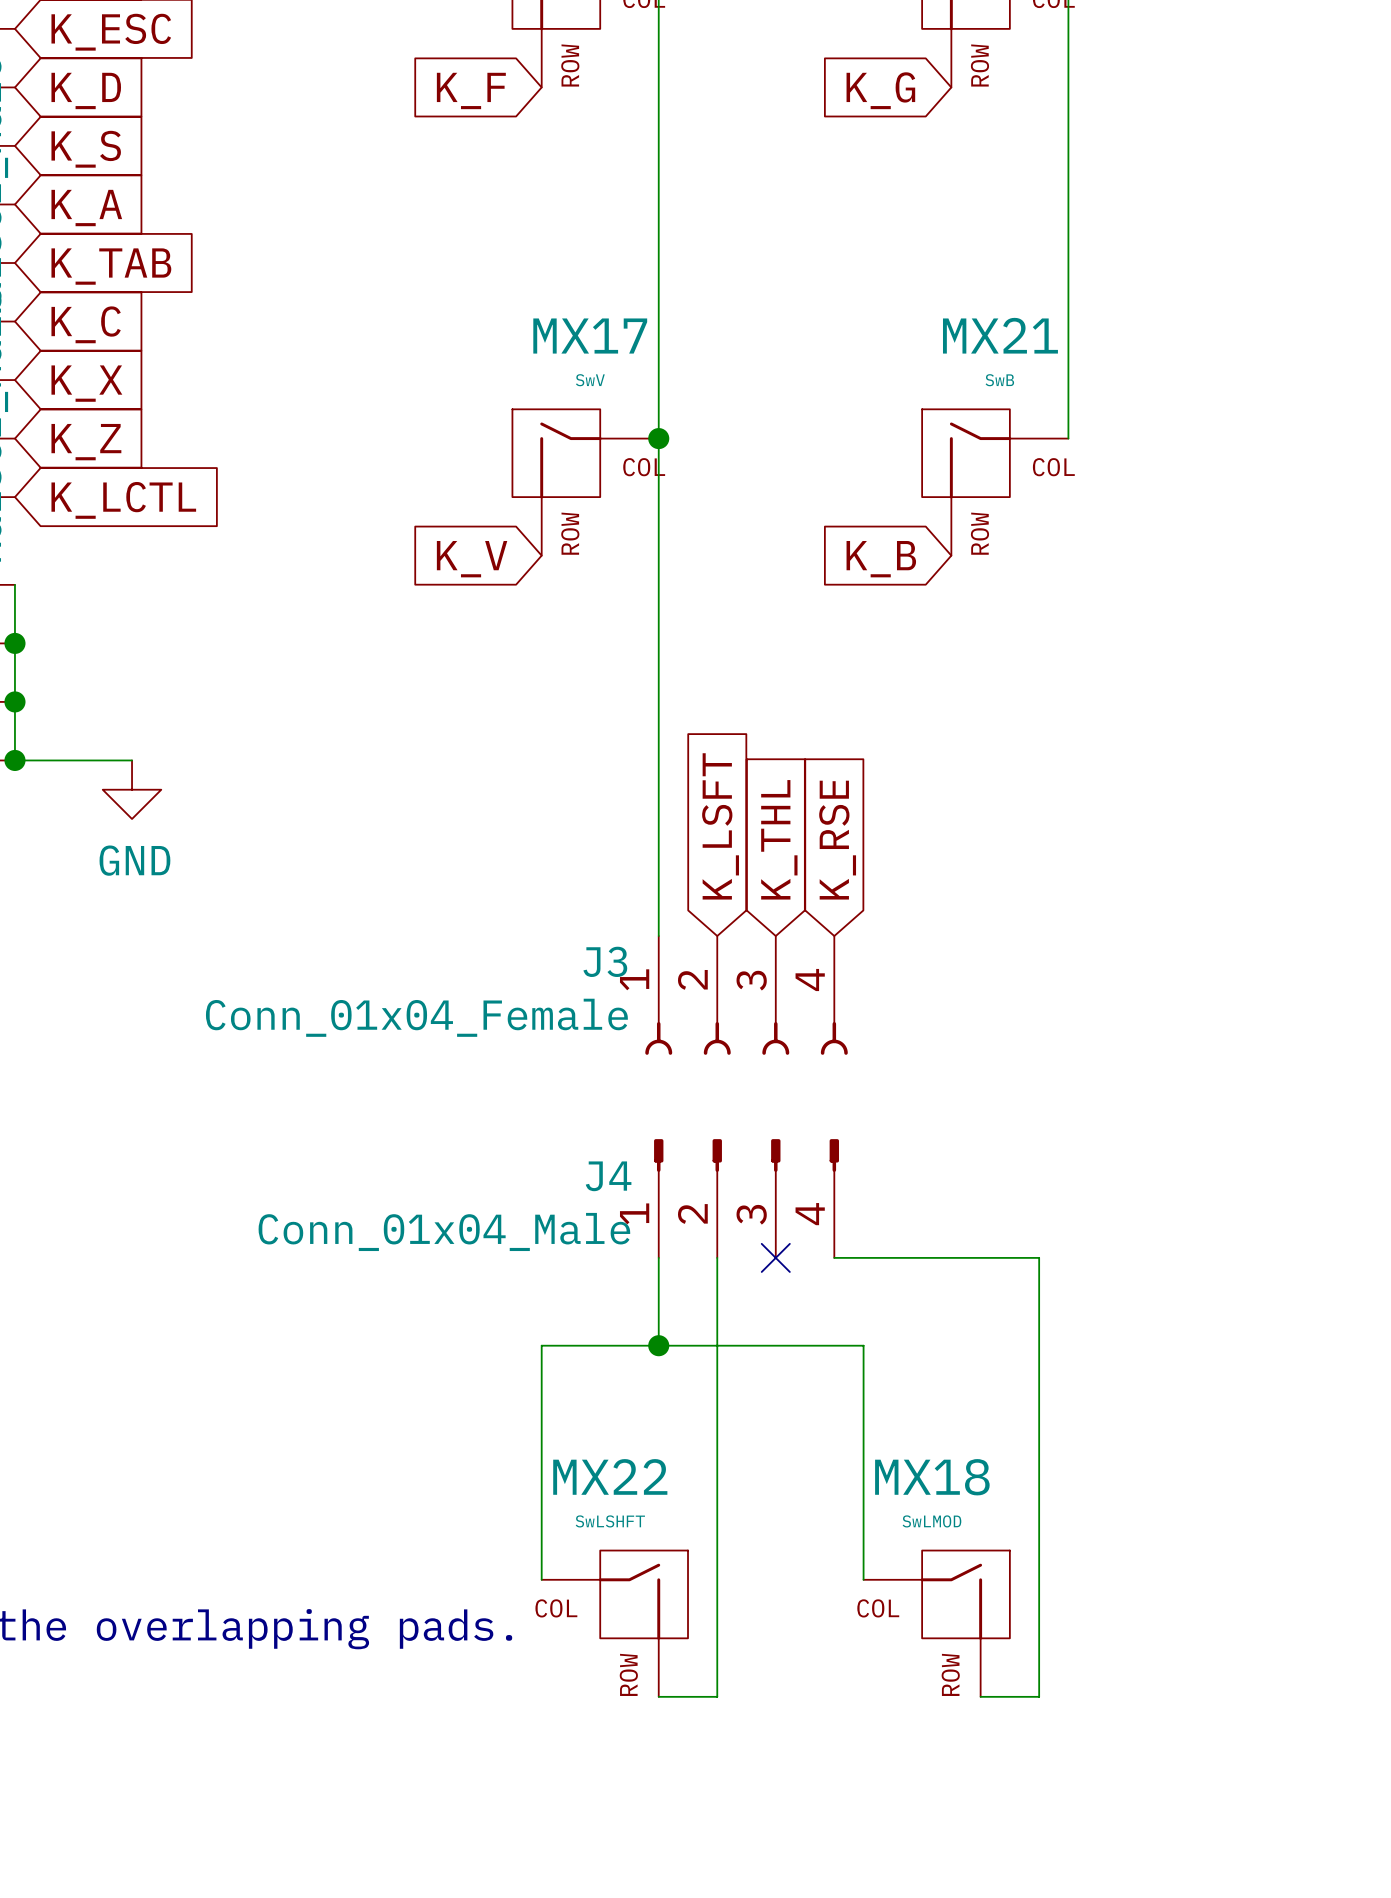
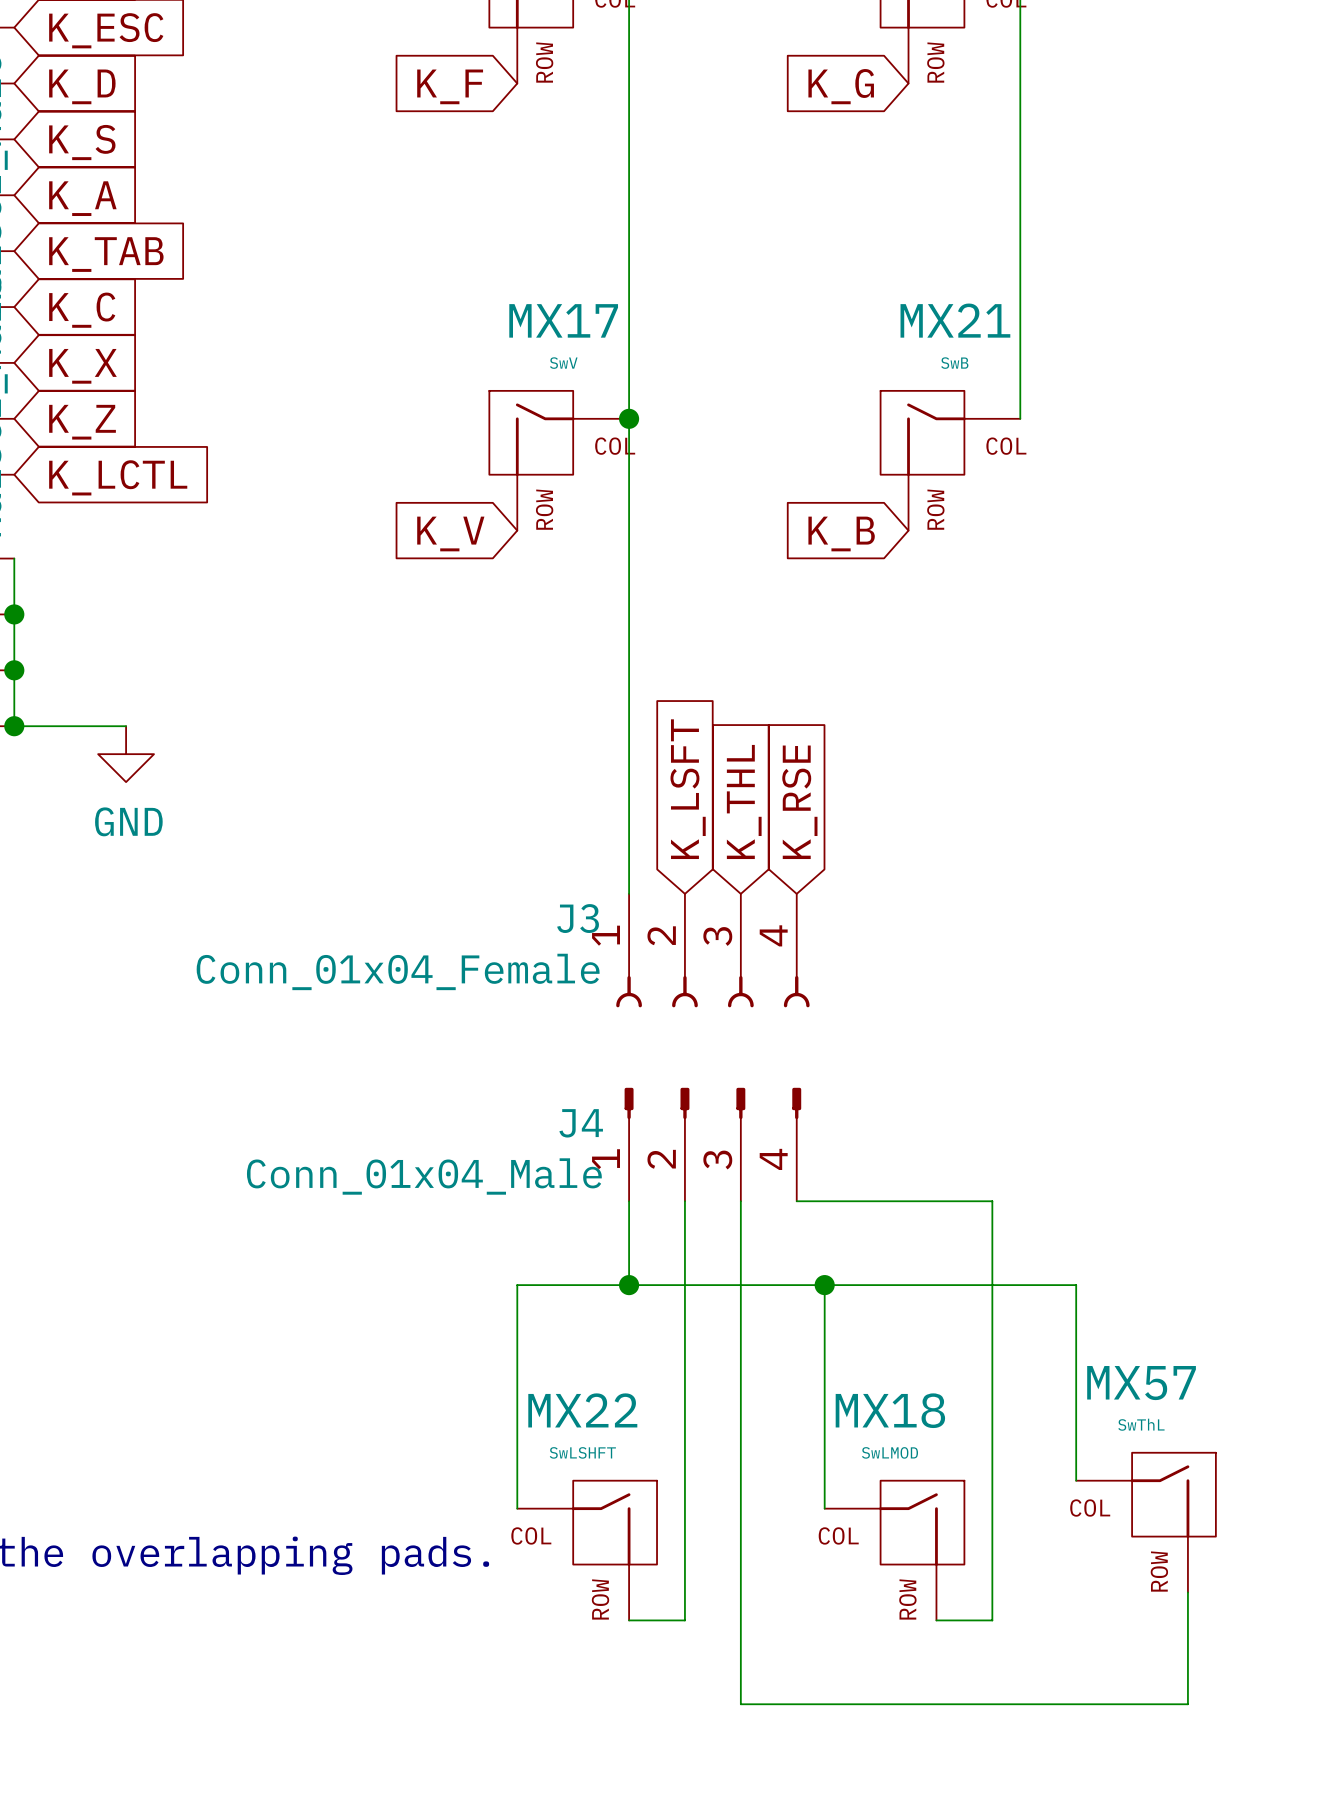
wire: none -> (740, 1201) (740, 1704) (1187, 1704) (1187, 1592)
no-connect mark: (775, 1257) -> none
wire: none -> (824, 1285) (1076, 1285) (1076, 1480)
junction: none -> (824, 1285)
MX57: none -> SwThL (1146, 1522)

